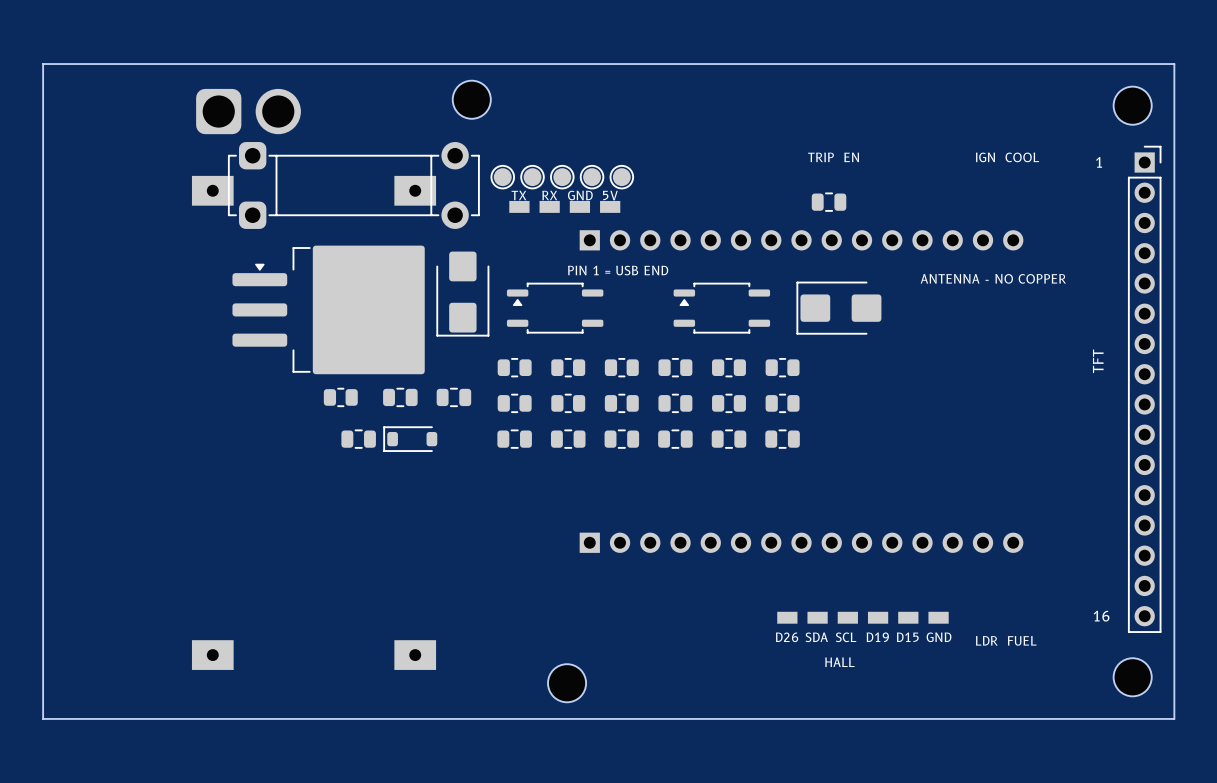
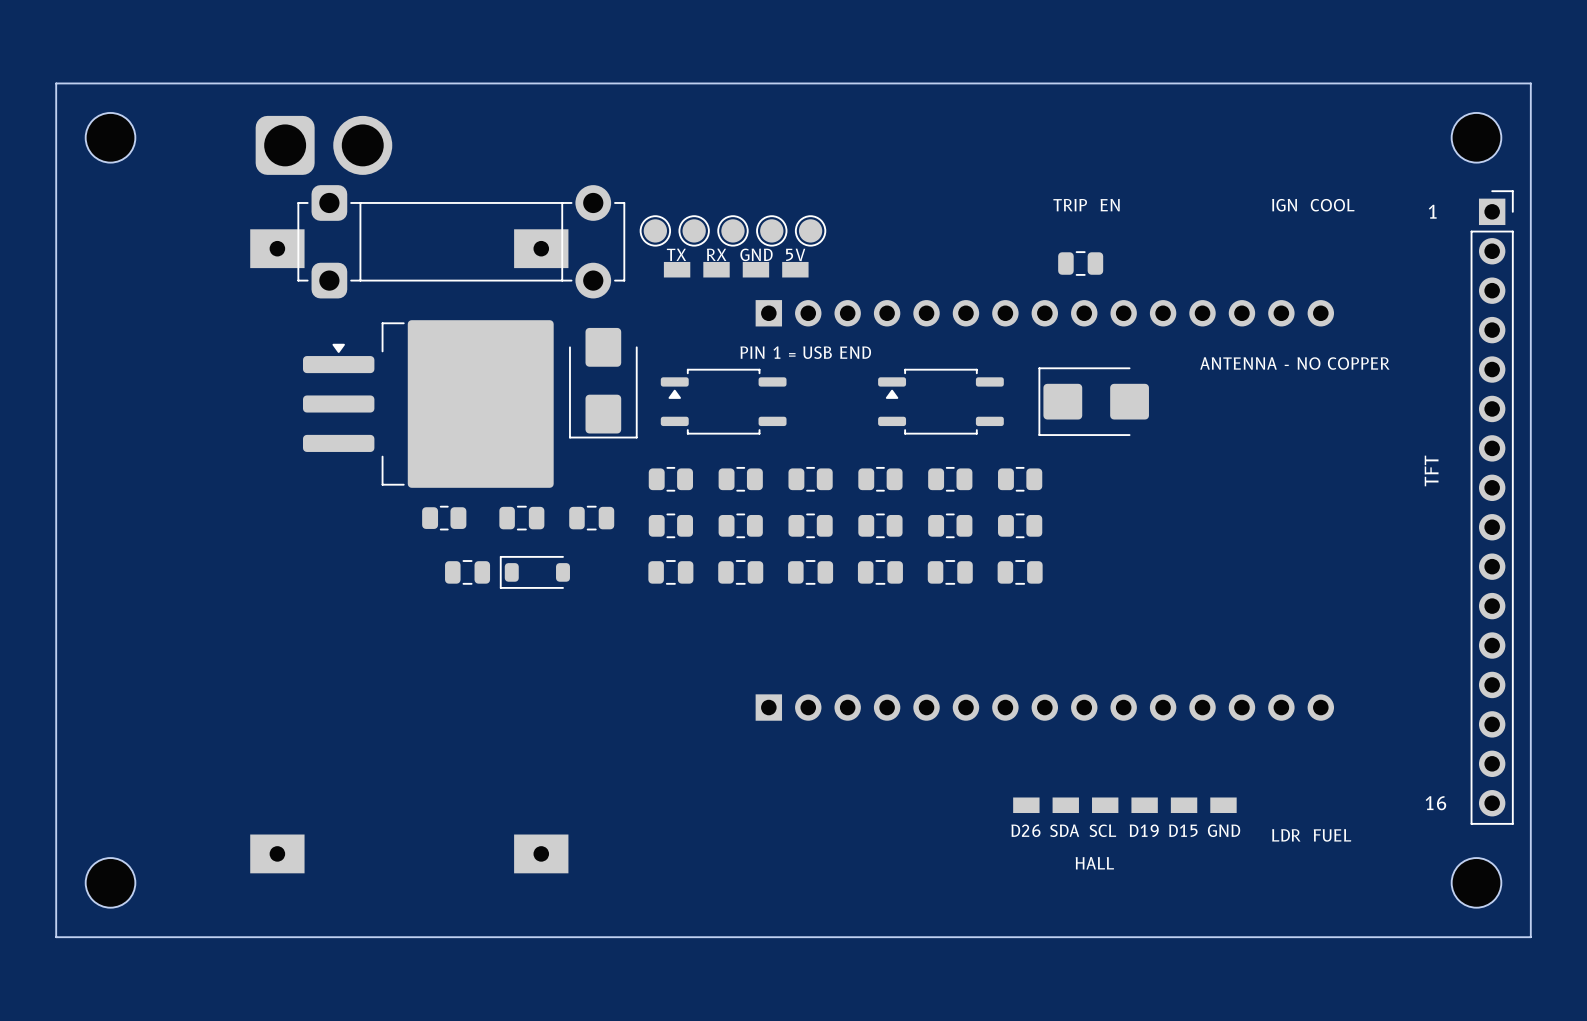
part: (471, 99) -> none
part: none -> (110, 137)
part: none -> (110, 882)
part: (567, 683) -> none

